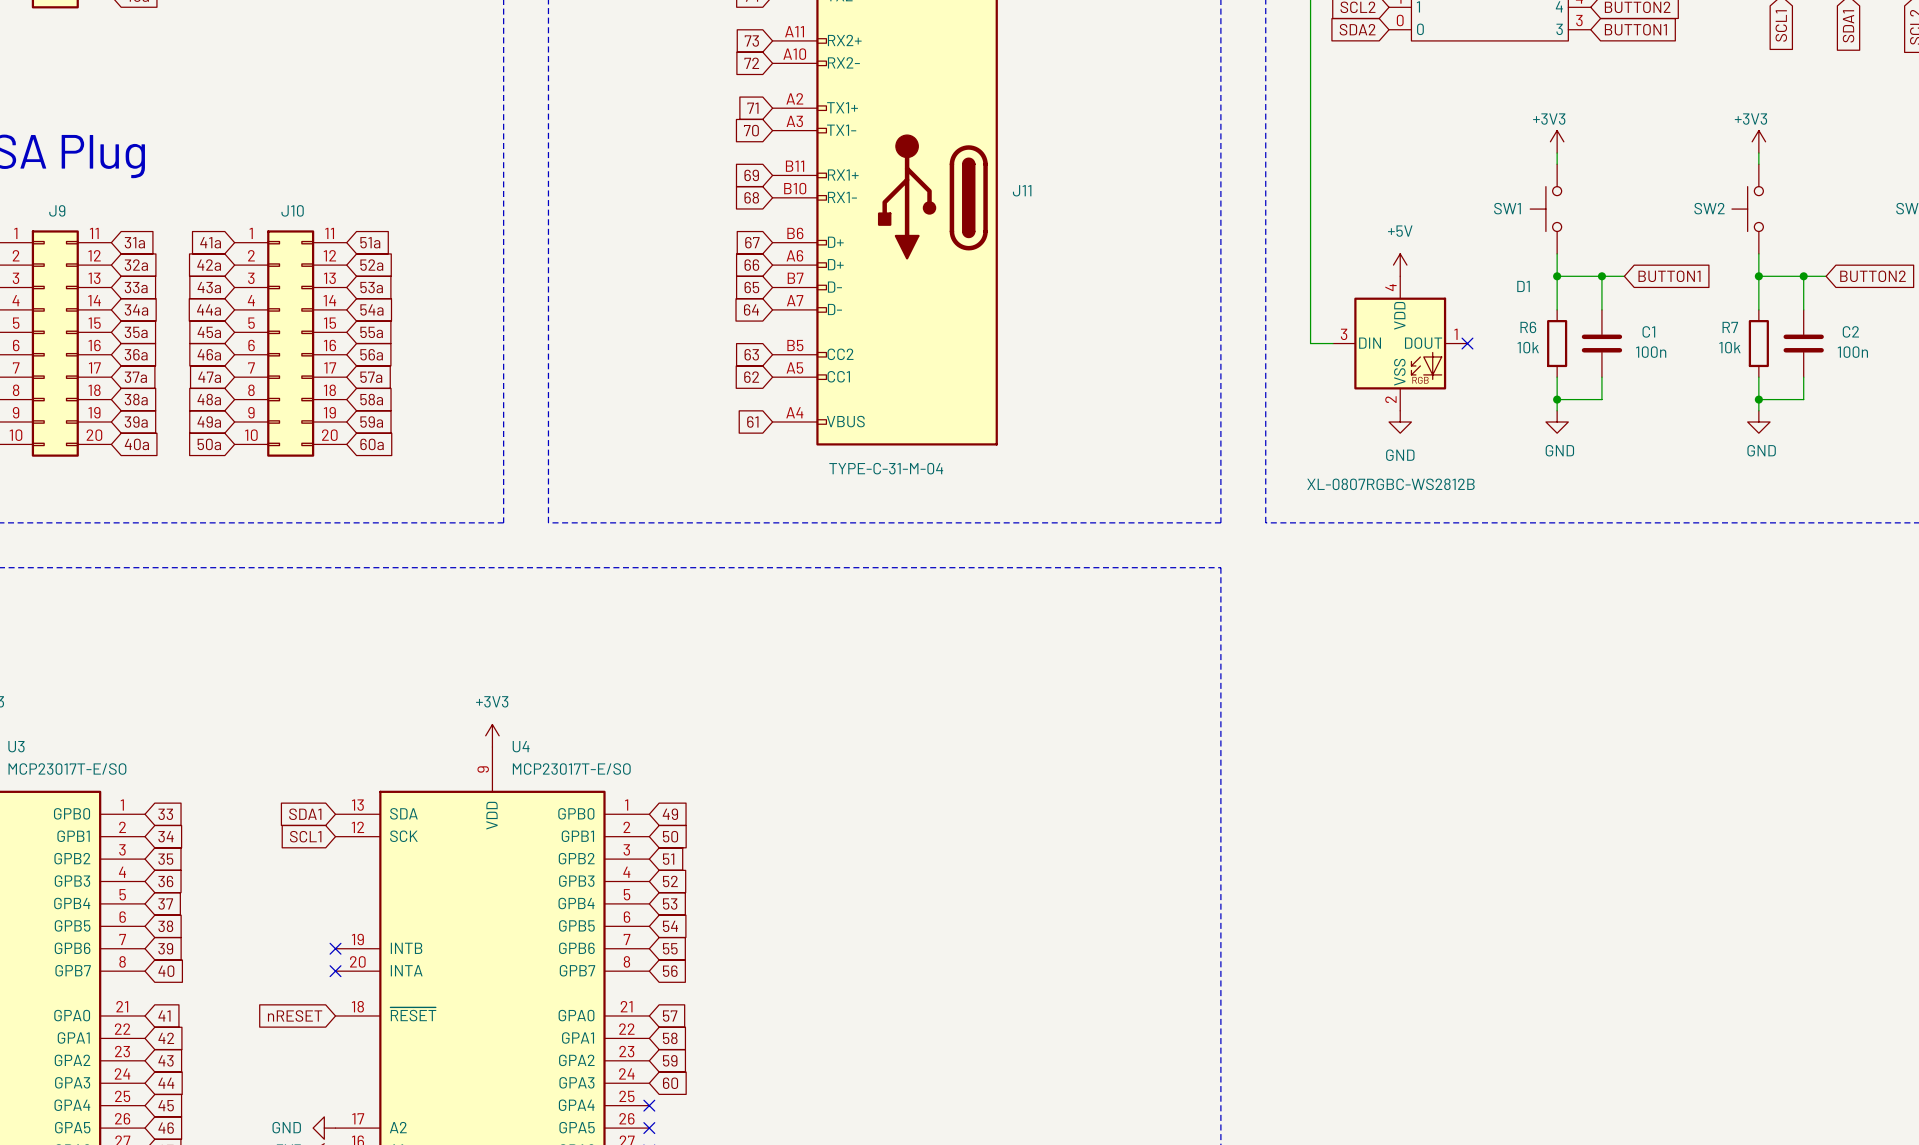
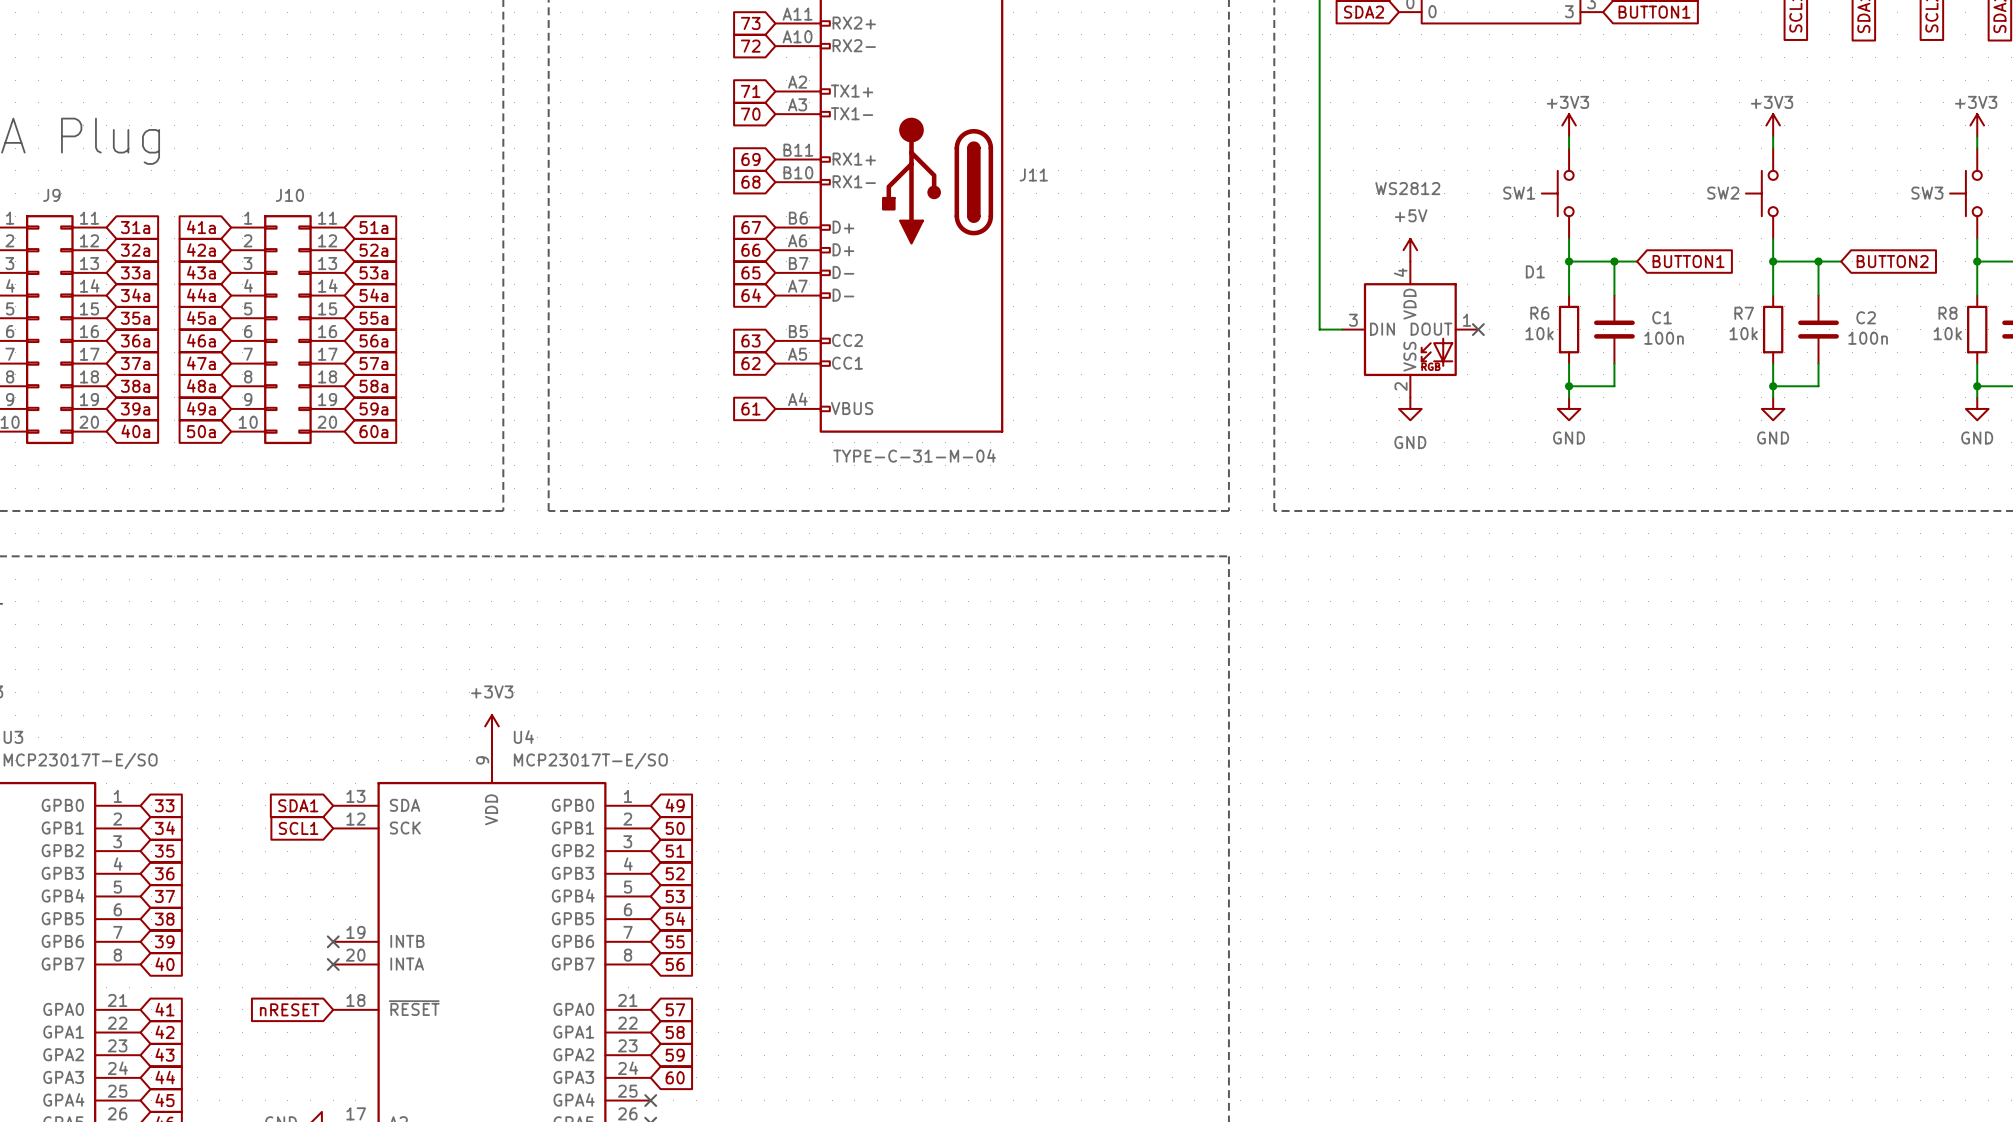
D1 value: XL-0807RGBC-WS2812B (1390, 484) -> WS2812 (1407, 188)

